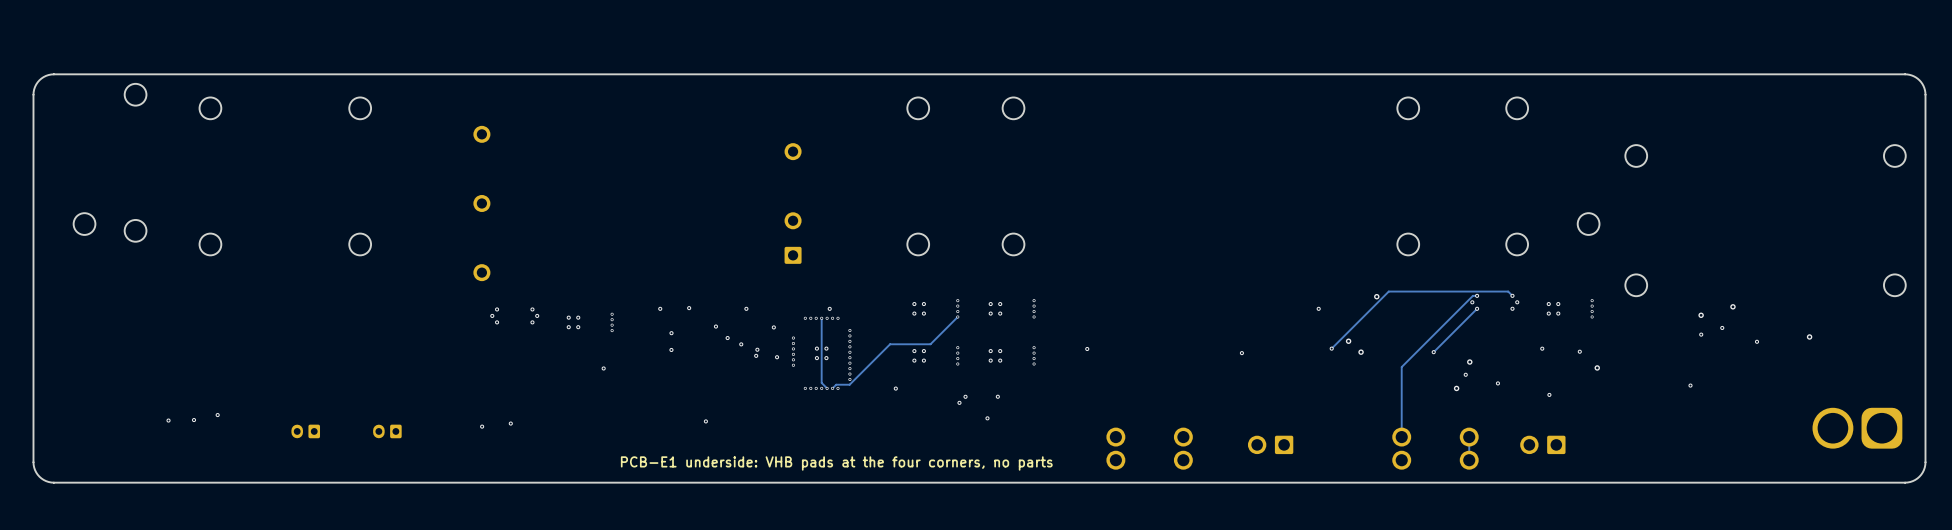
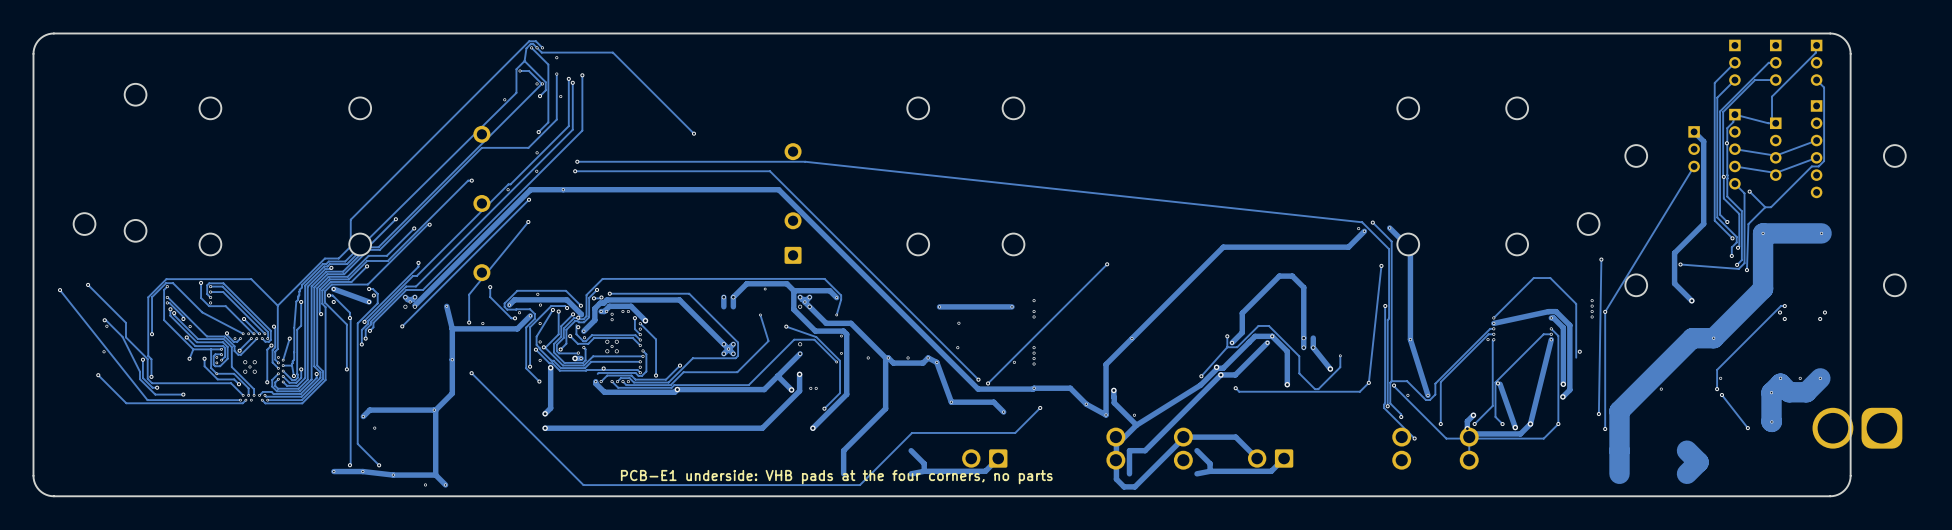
track: none -> (1816, 45) (1815, 52) (1772, 96) (1772, 123)
track: none -> (531, 47) (548, 64) (548, 122) (538, 132)
via: none -> (531, 47)
via: none -> (537, 47)
track: none -> (542, 47) (535, 41) (529, 41) (350, 219) (350, 246) (338, 258) (324, 258) (277, 305)
via: none -> (542, 47)
via: none -> (556, 57)
track: none -> (524, 61) (516, 69) (516, 92) (345, 261) (328, 261) (323, 263) (301, 285) (296, 301) (294, 352)
track: none -> (524, 61) (526, 48) (530, 44) (533, 44) (541, 52) (612, 52) (693, 133)
track: none -> (524, 61) (545, 82) (545, 90) (540, 96)
track: none -> (1734, 62) (1714, 82) (1714, 220) (1732, 238)
part: none -> (1734, 62)
track: none -> (1775, 62) (1768, 62) (1720, 111) (1720, 214) (1727, 222)
part: none -> (1775, 62)
part: none -> (1816, 62)
track: none -> (520, 70) (528, 70) (541, 83)
via: none -> (520, 70)
track: none -> (556, 74) (556, 119) (528, 147) (481, 147) (379, 249) (368, 249) (344, 274) (327, 274) (314, 287) (314, 366) (320, 372) (320, 377) (301, 396) (264, 395)
via: none -> (556, 74)
track: none -> (582, 75) (582, 130) (422, 289) (406, 289) (373, 322) (373, 327) (369, 330)
via: none -> (582, 75)
track: none -> (568, 78) (568, 126) (416, 275) (413, 275) (368, 320) (368, 323) (361, 329) (361, 344)
via: none -> (568, 78)
track: none -> (1734, 80) (1717, 97) (1717, 217) (1736, 236) (1736, 242) (1731, 247) (1731, 255)
track: none -> (1775, 80) (1755, 80) (1723, 112) (1723, 198) (1739, 213) (1738, 247)
track: none -> (1816, 80) (1824, 87) (1824, 161) (1818, 166) (1811, 166) (1771, 207) (1765, 207)
track: none -> (572, 82) (572, 129) (416, 286) (406, 286) (370, 321) (370, 324) (365, 329) (365, 338)
via: none -> (572, 82)
via: none -> (537, 83)
track: none -> (541, 83) (378, 247) (367, 247) (343, 271) (326, 271) (311, 286) (311, 379) (299, 391) (276, 391) (272, 386) (272, 379) (278, 373)
via: none -> (542, 83)
board edge: (33, 94) (35, 86) (39, 80) (46, 75) (53, 74) (1905, 74) (1913, 76) (1919, 80) (1923, 85) (1925, 94) (1925, 462) (1921, 474) (1915, 479) (1907, 482) (53, 482) (46, 481) (39, 476) (35, 470) (33, 462) -> (33, 94) (34, 48) (41, 37) (53, 33) (1830, 33) (1838, 35) (1844, 39) (1849, 46) (1850, 53) (1850, 475) (1846, 488) (1835, 495) (53, 496) (43, 493) (36, 486) (33, 478) (33, 462)
via: none -> (540, 96)
via: none -> (560, 96)
via: none -> (504, 99)
track: none -> (1775, 123) (1768, 123) (1734, 114) (1733, 122) (1727, 128) (1727, 196) (1741, 211) (1741, 260) (1737, 264)
track: none -> (1694, 131) (1703, 141) (1703, 223) (1674, 253) (1674, 283) (1691, 300)
via: none -> (538, 132)
via: none -> (693, 133)
track: none -> (1816, 140) (1775, 155)
via: none -> (1726, 143)
part: none -> (1694, 149)
track: none -> (1734, 149) (1775, 155)
part: none -> (1734, 149)
part: none -> (1775, 149)
part: none -> (1816, 149)
via: none -> (537, 152)
track: none -> (1816, 157) (1775, 172)
track: none -> (577, 161) (805, 161) (1362, 222) (1389, 249) (1387, 406)
via: none -> (577, 161)
track: none -> (1694, 166) (1605, 311) (1605, 429)
track: none -> (1734, 166) (1775, 172)
via: none -> (536, 171)
track: none -> (575, 171) (770, 171) (978, 379)
via: none -> (575, 171)
via: none -> (1723, 176)
track: none -> (471, 180) (468, 180) (387, 261) (367, 261) (348, 279) (329, 279) (319, 289) (321, 314)
via: none -> (471, 180)
track: none -> (1734, 183) (1744, 193) (1744, 263) (1738, 268) (1680, 264)
via: none -> (508, 189)
via: none -> (563, 189)
track: none -> (1749, 191) (1765, 207)
via: none -> (1749, 191)
track: none -> (528, 199) (402, 326)
via: none -> (529, 199)
track: none -> (1765, 207) (1748, 224) (1746, 270)
track: none -> (395, 219) (370, 244) (366, 244) (347, 264) (329, 264) (324, 266) (305, 285) (305, 378) (297, 385) (287, 385) (283, 381)
via: none -> (395, 219)
track: none -> (528, 221) (469, 294) (469, 322)
via: none -> (528, 221)
track: none -> (1372, 222) (1391, 241) (1391, 381)
via: none -> (1372, 222)
via: none -> (1727, 222)
track: none -> (429, 224) (367, 284) (331, 284) (324, 291) (324, 302) (346, 324) (346, 369)
via: none -> (429, 224)
track: none -> (1389, 227) (1410, 248) (1410, 339) (1427, 395)
via: none -> (1389, 227)
track: none -> (414, 228) (386, 255) (368, 255) (347, 276) (328, 276) (317, 288) (317, 365) (323, 371) (323, 378) (301, 400) (267, 400)
via: none -> (414, 228)
via: none -> (1358, 228)
track: none -> (1364, 231) (1348, 247) (1223, 247) (1106, 364) (1106, 414) (1086, 404) (1070, 388) (978, 389) (778, 189) (530, 189) (414, 305)
via: none -> (1364, 231)
via: none -> (1763, 233)
track: none -> (1821, 233) (1763, 233) (1763, 288) (1713, 338) (1692, 338) (1619, 411) (1619, 473)
via: none -> (1821, 233)
via: none -> (1732, 238)
via: none -> (1738, 247)
via: none -> (1731, 255)
track: none -> (1601, 259) (1598, 414)
via: none -> (1601, 259)
track: none -> (418, 262) (418, 266) (364, 321)
via: none -> (418, 262)
track: none -> (1107, 264) (988, 383)
via: none -> (1107, 264)
via: none -> (1680, 264)
via: none -> (1737, 264)
track: none -> (1381, 265) (1368, 382) (1359, 391) (1239, 391) (1235, 388)
via: none -> (1381, 265)
track: none -> (367, 266) (351, 281) (330, 281) (322, 290) (322, 303) (325, 307) (325, 380) (302, 403) (265, 403) (262, 400)
via: none -> (367, 266)
track: none -> (331, 267) (325, 269) (307, 286) (307, 379) (298, 388) (277, 388) (275, 382) (278, 379)
via: none -> (331, 267)
via: none -> (1746, 270)
track: none -> (201, 282) (201, 298) (209, 306) (225, 306) (254, 333)
via: none -> (201, 282)
track: none -> (88, 284) (125, 322) (125, 337) (147, 359) (147, 378) (152, 383) (231, 383) (243, 395)
via: none -> (88, 284)
track: none -> (167, 286) (164, 289) (164, 320) (193, 349)
via: none -> (167, 286)
track: none -> (210, 286) (222, 286) (268, 332) (267, 338)
via: none -> (210, 286)
track: none -> (490, 287) (490, 297) (511, 318) (515, 318)
via: none -> (490, 287)
track: none -> (333, 289) (369, 301)
via: none -> (333, 289)
track: none -> (369, 289) (372, 289) (377, 293) (377, 303) (357, 323) (357, 443) (379, 465)
via: none -> (369, 289)
track: none -> (597, 289) (589, 297) (589, 317) (584, 322) (575, 321) (566, 329) (566, 343) (560, 349)
via: none -> (597, 289)
via: none -> (765, 289)
track: none -> (60, 290) (147, 400) (240, 400)
via: none -> (60, 290)
track: none -> (793, 290) (786, 283) (746, 283) (733, 297) (733, 306)
track: none -> (793, 290) (829, 290) (836, 297)
track: none -> (793, 290) (793, 309) (815, 331) (843, 331) (846, 334) (846, 394) (812, 428)
track: none -> (210, 292) (223, 292) (264, 333)
via: none -> (210, 292)
track: none -> (609, 293) (689, 293) (738, 342) (738, 355) (735, 358) (692, 358) (668, 382) (633, 382) (629, 378) (620, 378) (617, 381)
via: none -> (609, 293)
via: none -> (537, 294)
track: none -> (328, 295) (332, 295) (349, 312) (349, 465)
via: none -> (328, 295)
via: none -> (373, 295)
track: (1477, 295) (1472, 295) (1401, 367) (1401, 437) -> none
via: (1477, 295) -> none
track: (1512, 295) (1508, 291) (1388, 291) (1331, 348) -> none
via: (1512, 295) -> none
via: (1376, 296) -> none
track: none -> (167, 297) (206, 336) (224, 336) (234, 346) (234, 351) (238, 354) (240, 354) (256, 338)
via: none -> (167, 297)
track: none -> (210, 297) (207, 294) (207, 285) (209, 283) (223, 283) (270, 330) (270, 339) (268, 341) (265, 341) (262, 338)
via: none -> (210, 297)
via: none -> (405, 297)
track: none -> (414, 297) (412, 299) (407, 299) (405, 297)
via: none -> (414, 297)
track: none -> (601, 297) (593, 298)
via: none -> (601, 297)
track: none -> (723, 297) (723, 306)
via: none -> (723, 297)
via: none -> (733, 297)
via: none -> (800, 297)
track: none -> (809, 297) (807, 299) (802, 299) (800, 297)
via: none -> (809, 297)
via: none -> (836, 297)
via: none -> (593, 298)
track: none -> (804, 299) (804, 302) (826, 323) (851, 323) (885, 357)
via: (957, 300) -> none
track: none -> (301, 301) (301, 325) (297, 329) (297, 377) (292, 380) (283, 371)
via: none -> (301, 301)
via: none -> (333, 301)
via: none -> (369, 301)
track: none -> (167, 302) (183, 316) (183, 319)
via: none -> (167, 302)
via: none -> (210, 302)
via: none -> (410, 302)
via: none -> (804, 302)
via: (1472, 302) -> none
via: (1517, 302) -> none
via: (914, 304) -> none
via: (923, 304) -> none
via: (990, 304) -> none
via: (1000, 304) -> none
via: (1548, 304) -> none
via: (1558, 304) -> none
track: none -> (277, 305) (251, 279) (166, 279) (148, 297) (148, 356) (151, 359) (151, 376)
track: none -> (277, 305) (277, 349) (275, 351) (275, 359) (278, 362)
track: none -> (509, 305) (514, 299) (566, 299) (581, 314)
via: none -> (509, 305)
via: none -> (540, 305)
track: none -> (580, 305) (565, 290) (517, 290) (504, 303) (507, 309) (530, 309) (534, 314) (534, 318) (526, 327) (526, 368) (539, 381)
via: none -> (580, 305)
via: none -> (405, 306)
via: none -> (414, 306)
track: none -> (446, 306) (452, 328)
via: none -> (446, 306)
via: none -> (800, 306)
via: none -> (809, 306)
via: none -> (939, 306)
via: (957, 306) -> none
track: none -> (1011, 306) (939, 306)
via position: (1034, 306) -> (1011, 306)
track: none -> (1385, 306) (1383, 407) (1414, 438)
via: none -> (1385, 306)
via: (1732, 306) -> none
track: none -> (1784, 306) (1780, 306) (1717, 369) (1717, 389)
via: none -> (1784, 306)
track: none -> (567, 308) (565, 306) (551, 306) (530, 327) (530, 366)
via: none -> (567, 308)
via: (660, 308) -> none
via: (689, 308) -> none
via: (746, 308) -> none
via: (829, 308) -> none
via: (1318, 308) -> none
track: (1477, 308) (1433, 352) -> none
via: (1477, 308) -> none
via: (1512, 308) -> none
track: none -> (170, 309) (170, 315) (196, 342) (223, 342) (227, 346) (227, 358) (220, 366) (215, 366) (213, 356) (221, 354)
via: none -> (170, 309)
via: (497, 309) -> none
via: (532, 309) -> none
track: none -> (552, 309) (536, 336) (536, 345) (560, 368) (585, 368) (591, 361) (640, 361)
via: none -> (552, 309)
track: none -> (558, 311) (558, 334) (545, 347)
via: none -> (558, 311)
track: none -> (601, 311) (604, 311) (609, 306) (631, 306) (645, 320)
via: none -> (601, 311)
via: none -> (606, 311)
via: none -> (622, 311)
via: none -> (628, 311)
via: (957, 311) -> none
via: none -> (1605, 311)
via: none -> (519, 312)
via: none -> (1780, 312)
via: none -> (1824, 312)
track: none -> (174, 313) (198, 339) (223, 339) (231, 347) (231, 367) (254, 389) (254, 395)
via: none -> (174, 313)
via: (914, 313) -> none
via: (923, 313) -> none
via: (990, 313) -> none
via: (1000, 313) -> none
via: (1548, 313) -> none
via: (1558, 313) -> none
via: none -> (321, 314)
track: none -> (573, 314) (561, 326) (561, 336) (553, 344) (553, 352) (564, 362) (582, 362) (585, 360) (583, 347)
via: none -> (573, 314)
track: none -> (760, 314) (768, 341) (737, 372) (683, 372) (670, 385) (626, 385) (622, 381)
via: none -> (760, 314)
track: none -> (836, 314) (841, 295) (824, 278) (602, 278) (586, 295) (586, 316) (583, 319) (574, 318) (563, 328) (563, 337) (556, 344) (556, 351) (559, 353) (578, 353)
via: none -> (836, 314)
via: (492, 315) -> none
track: none -> (530, 315) (517, 328) (452, 328)
via: none -> (530, 315)
via: (537, 315) -> none
via position: (1701, 315) -> (1691, 300)
track: (957, 316) (930, 344) (890, 344) (849, 384) (836, 384) (832, 388) -> none
via: (957, 316) -> none
via: (568, 317) -> none
track: none -> (1493, 317) (1533, 278) (1550, 278) (1576, 303) (1576, 357)
via: none -> (1493, 317)
track: none -> (1551, 317) (1563, 327) (1563, 384)
via: none -> (1551, 317)
via: none -> (349, 318)
via: none -> (515, 318)
track: none -> (634, 318) (634, 329) (640, 334)
via: none -> (634, 318)
via: (805, 318) -> none
via: (810, 318) -> none
via: (816, 318) -> none
track: (821, 318) (821, 382) (827, 388) -> none
via: (821, 318) -> none
via: (827, 318) -> none
via: (832, 318) -> none
via: (838, 318) -> none
via: none -> (1784, 318)
via: none -> (1820, 318)
via: none -> (183, 319)
track: none -> (244, 319) (259, 333)
via: none -> (244, 319)
track: none -> (104, 320) (122, 336) (139, 371) (139, 379) (155, 394) (183, 394)
via: none -> (104, 320)
via: none -> (645, 320)
via: none -> (364, 321)
via: none -> (469, 322)
via: (497, 322) -> none
via: (532, 322) -> none
via: none -> (482, 323)
via: none -> (540, 323)
track: none -> (640, 323) (656, 339) (656, 375)
via: none -> (640, 323)
via: none -> (958, 323)
track: none -> (1493, 323) (1556, 311) (1569, 325) (1569, 389) (1562, 396)
via: none -> (1493, 323)
track: none -> (576, 325) (576, 334) (583, 341) (591, 335) (635, 335) (640, 340)
via: (612, 325) -> none
via: none -> (106, 326)
via: none -> (190, 326)
track: none -> (273, 326) (275, 347) (272, 349) (272, 362) (278, 368)
via: none -> (273, 326)
via: none -> (402, 326)
via: (715, 326) -> none
track: none -> (786, 326) (816, 337) (840, 360) (840, 393) (824, 408)
via: (568, 327) -> none
via position: (773, 327) -> (786, 326)
via: (1722, 327) -> none
track: none -> (452, 328) (452, 393) (435, 410)
track: none -> (1493, 328) (1490, 328) (1435, 383) (1435, 394) (1429, 400) (1425, 400) (1407, 381) (1391, 381)
via: none -> (1493, 328)
track: none -> (1551, 328) (1558, 335) (1558, 424) (1543, 438) (1446, 438) (1394, 385)
via: none -> (1551, 328)
via: none -> (640, 329)
via: none -> (369, 330)
via: (612, 330) -> none
via: (849, 330) -> none
track: none -> (583, 331) (594, 320) (594, 308) (606, 299) (679, 299) (733, 353)
via: none -> (583, 331)
track: none -> (226, 333) (233, 341) (237, 341) (240, 338)
via: none -> (226, 333)
track: none -> (243, 333) (202, 312) (173, 283) (166, 283) (152, 297) (152, 334)
via: none -> (243, 333)
via: none -> (248, 333)
via: none -> (254, 333)
via: none -> (259, 333)
via: none -> (264, 333)
via: (671, 333) -> none
via: none -> (152, 334)
via: none -> (640, 334)
track: none -> (1493, 334) (1488, 334) (1440, 382) (1440, 424)
via: none -> (1493, 334)
track: none -> (1551, 334) (1543, 334) (1495, 382) (1495, 416) (1502, 424)
via: none -> (1551, 334)
via: (1701, 334) -> none
via: (849, 335) -> none
track: none -> (570, 336) (577, 343) (588, 343) (594, 338) (632, 338) (640, 345)
via: none -> (570, 336)
via: none -> (841, 336)
track: none -> (1227, 336) (1227, 347)
via: none -> (1227, 336)
via: none -> (1272, 336)
via: (1809, 336) -> none
track: none -> (186, 337) (195, 346) (223, 346) (225, 348) (225, 356) (221, 360)
via: none -> (186, 337)
via: none -> (584, 337)
via: none -> (235, 338)
via: none -> (240, 338)
track: none -> (251, 338) (239, 350)
via: none -> (251, 338)
via: none -> (256, 338)
via: none -> (262, 338)
via: none -> (267, 338)
track: none -> (289, 338) (283, 360)
via: none -> (289, 338)
via: none -> (365, 338)
via: (727, 338) -> none
via: (793, 338) -> none
via: none -> (1131, 338)
via: none -> (1303, 338)
track: none -> (1313, 338) (1313, 347) (1330, 368)
via: none -> (1713, 338)
via: none -> (1410, 339)
via: none -> (1488, 339)
track: none -> (1493, 339) (1492, 405) (1474, 424)
via: none -> (1493, 339)
track: none -> (1551, 339) (1530, 424) (1520, 433) (1472, 433) (1467, 428) (1467, 421) (1473, 415)
via: none -> (1551, 339)
via: none -> (640, 340)
via: none -> (540, 341)
via: none -> (607, 341)
via: none -> (616, 341)
via: (849, 341) -> none
via: (1348, 341) -> none
via: (1757, 341) -> none
track: none -> (1232, 342) (1242, 332) (1242, 313) (1279, 276) (1292, 276) (1303, 287) (1303, 347)
via: none -> (1232, 342)
track: none -> (1267, 342) (1235, 374) (1220, 374) (1145, 450) (1129, 450) (1129, 473)
via: none -> (1267, 342)
via: (793, 343) -> none
via: none -> (361, 344)
via: none -> (723, 344)
track: none -> (733, 344) (723, 353)
via: none -> (733, 344)
via: (741, 344) -> none
via: none -> (800, 344)
track: none -> (271, 345) (267, 349) (267, 382)
via: none -> (271, 345)
via: none -> (640, 345)
via: none -> (612, 346)
via: (849, 346) -> none
via: none -> (543, 347)
track: none -> (545, 347) (562, 365) (584, 365) (593, 356) (643, 356)
via: none -> (583, 347)
track: none -> (1227, 347) (1201, 376)
track: none -> (1227, 347) (1237, 347) (1258, 325) (1268, 325) (1299, 356) (1299, 373) (1315, 389) (1318, 389) (1340, 367) (1340, 355)
via: none -> (1303, 347)
via: none -> (1313, 347)
via: (793, 348) -> none
via: (816, 348) -> none
via: (826, 348) -> none
via: (1087, 348) -> none
via: (1331, 348) -> none
via: (1542, 348) -> none
track: none -> (193, 349) (189, 358)
track: none -> (211, 349) (211, 368) (216, 373) (234, 373) (248, 388) (248, 395)
track: none -> (221, 349) (193, 349)
via: none -> (221, 349)
track: none -> (535, 349) (559, 370) (637, 370) (640, 372)
via: none -> (535, 349)
via: none -> (560, 349)
via: (671, 349) -> none
via: none -> (728, 349)
via: (757, 349) -> none
via: none -> (239, 350)
track: none -> (643, 350) (646, 354) (646, 371) (641, 375) (635, 372) (597, 373)
via: none -> (643, 350)
via: none -> (104, 351)
via: none -> (607, 351)
via: none -> (616, 351)
via: (914, 351) -> none
via: (923, 351) -> none
via: (990, 351) -> none
via: (1000, 351) -> none
track: none -> (294, 352) (292, 365)
via: (849, 352) -> none
via: (1361, 352) -> none
via: (1433, 352) -> none
via: none -> (578, 353)
via: none -> (723, 353)
via: none -> (733, 353)
track: none -> (800, 353) (777, 376)
via: none -> (800, 353)
via: none -> (841, 353)
via: (957, 353) -> none
via: (1241, 353) -> none
via: none -> (221, 354)
via: (793, 354) -> none
via: (756, 355) -> none
via: none -> (1340, 355)
via: none -> (643, 356)
via: none -> (216, 357)
via: none -> (278, 357)
via: (777, 357) -> none
via: (849, 357) -> none
via: none -> (868, 357)
track: none -> (885, 357) (885, 408) (843, 450) (843, 473)
track: none -> (885, 357) (893, 363) (923, 363) (928, 357) (936, 362) (951, 402) (993, 402) (1003, 412)
via: none -> (888, 357)
via: none -> (908, 357)
via: none -> (928, 357)
via: none -> (189, 358)
track: none -> (204, 358) (204, 366) (217, 379) (234, 379) (238, 384)
via: none -> (204, 358)
via: none -> (575, 358)
track: none -> (581, 358) (575, 358)
via: none -> (581, 358)
via: (816, 358) -> none
via: (826, 358) -> none
via: (957, 358) -> none
track: none -> (142, 359) (142, 378) (152, 387) (157, 387)
via: none -> (142, 359)
via: none -> (452, 359)
via: (793, 359) -> none
via: none -> (221, 360)
via: none -> (283, 360)
via: none -> (540, 360)
via: (914, 360) -> none
via: (923, 360) -> none
via: (990, 360) -> none
via: (1000, 360) -> none
via: none -> (640, 361)
via: none -> (216, 362)
via: none -> (245, 362)
via: none -> (254, 362)
via: none -> (278, 362)
track: none -> (836, 362) (814, 339) (794, 339) (748, 385) (674, 385) (671, 387) (618, 387) (612, 381)
via: none -> (836, 362)
via: none -> (936, 362)
via: none -> (1014, 362)
via: (1469, 362) -> none
via: (849, 363) -> none
via: (957, 364) -> none
via: none -> (283, 365)
track: none -> (292, 365) (293, 376)
track: none -> (292, 365) (283, 365)
track: none -> (680, 365) (665, 379) (635, 379) (631, 375) (607, 375) (601, 381)
via: none -> (680, 365)
via: (793, 365) -> none
via: none -> (249, 366)
via: none -> (530, 366)
track: none -> (550, 367) (550, 408) (545, 413)
via: none -> (550, 367)
via: none -> (640, 367)
via: none -> (1216, 367)
via: (1597, 367) -> none
via: none -> (278, 368)
via: (849, 368) -> none
track: none -> (1217, 368) (1223, 368) (1255, 336) (1272, 336) (1287, 351) (1287, 384)
track: none -> (1217, 368) (1200, 385) (1136, 425)
via: none -> (1330, 368)
track: none -> (301, 369) (301, 377) (296, 382) (289, 382) (283, 376)
via: none -> (301, 369)
via: none -> (346, 369)
via: none -> (245, 371)
via: none -> (254, 371)
via: none -> (283, 371)
via: none -> (640, 372)
via: none -> (216, 373)
via: none -> (278, 373)
track: none -> (471, 373) (583, 485) (859, 485) (912, 432) (1015, 432) (1040, 407)
via: none -> (471, 373)
track: none -> (316, 374) (316, 378) (300, 393) (262, 391) (259, 395)
via: none -> (316, 374)
track: none -> (799, 374) (799, 391) (762, 428) (545, 428)
via: none -> (799, 374)
via: (849, 374) -> none
via: none -> (1220, 374)
via: (1465, 374) -> none
track: none -> (98, 375) (126, 403) (242, 403) (245, 400)
via: none -> (98, 375)
via: none -> (656, 375)
via: none -> (151, 376)
via: none -> (283, 376)
via: none -> (293, 376)
track: none -> (777, 376) (764, 389) (604, 392) (595, 381)
track: none -> (777, 376) (791, 389)
via: none -> (1201, 376)
via: none -> (1720, 378)
via: none -> (1780, 378)
via: none -> (1800, 378)
track: none -> (1820, 378) (1806, 392) (1789, 392) (1780, 383) (1771, 392) (1771, 421)
via: none -> (1820, 378)
via: none -> (278, 379)
via: (849, 379) -> none
via: none -> (978, 379)
via: none -> (283, 381)
via: none -> (539, 381)
via: none -> (595, 381)
via: none -> (601, 381)
via: none -> (612, 381)
via: none -> (617, 381)
via: none -> (622, 381)
via: none -> (628, 381)
track: none -> (1391, 381) (1390, 403) (1401, 414) (1401, 417)
via: none -> (267, 382)
via: none -> (1368, 382)
via: none -> (988, 383)
via: none -> (238, 384)
via: none -> (1287, 384)
track: none -> (1500, 384) (1515, 427)
via: none -> (1563, 384)
via: none -> (1394, 385)
via: (1690, 385) -> none
via: none -> (157, 387)
via: (805, 388) -> none
via: (821, 388) -> none
via: (827, 388) -> none
via: (832, 388) -> none
via: (838, 388) -> none
via: (895, 388) -> none
via: none -> (1034, 388)
via: none -> (1235, 388)
via: (1456, 388) -> none
via: none -> (677, 389)
via: none -> (791, 389)
via: none -> (1661, 389)
via: none -> (1717, 389)
track: none -> (1113, 390) (1114, 402) (1136, 425)
via: none -> (1113, 390)
via: none -> (1771, 392)
via: none -> (183, 394)
via: (1549, 394) -> none
track: none -> (1721, 394) (1747, 428)
via: none -> (1721, 394)
via: none -> (243, 395)
via: none -> (248, 395)
via: none -> (254, 395)
via: none -> (259, 395)
via: none -> (264, 395)
via: none -> (1407, 395)
via: none -> (1427, 395)
via: (965, 396) -> none
via: (997, 396) -> none
via: none -> (1562, 396)
via: none -> (240, 400)
via: none -> (245, 400)
via: none -> (251, 400)
via: none -> (262, 400)
via: none -> (267, 400)
via: none -> (951, 402)
via: (959, 402) -> none
via: none -> (1086, 404)
via: none -> (1387, 406)
via: none -> (1040, 407)
via: none -> (824, 408)
via: none -> (434, 410)
track: none -> (435, 410) (435, 475)
track: none -> (435, 410) (369, 410) (363, 416)
via: none -> (1003, 412)
via: none -> (545, 413)
via: none -> (1106, 414)
via: none -> (1598, 414)
via: (217, 415) -> none
via: none -> (1134, 415)
via: none -> (1473, 415)
via: none -> (363, 416)
via: none -> (1401, 417)
via: (987, 418) -> none
via: (168, 420) -> none
via: (194, 420) -> none
via: (705, 421) -> none
via: none -> (1771, 421)
via: (510, 423) -> none
via: none -> (1440, 424)
via: none -> (1474, 424)
via: none -> (1502, 424)
via: none -> (1530, 424)
via: none -> (1558, 424)
track: none -> (1136, 425) (1116, 445) (1116, 479) (1124, 486) (1134, 486) (1184, 437) (1235, 437) (1257, 458)
via: (482, 426) -> none
via: none -> (1515, 427)
via: none -> (374, 428)
via: none -> (545, 428)
via: none -> (812, 428)
via: none -> (1467, 428)
via: none -> (1747, 428)
via: none -> (1605, 429)
part: (305, 431) -> none
part: (387, 431) -> none
via: none -> (1414, 438)
part position: (1270, 444) -> (1270, 458)
part: (1542, 444) -> none
track: none -> (911, 450) (924, 463) (924, 471)
track: none -> (1197, 450) (1210, 463) (1210, 471)
track: none -> (1687, 450) (1698, 462) (1687, 473)
part: none -> (984, 458)
track: none -> (998, 458) (985, 471) (924, 471)
track: none -> (1284, 458) (1271, 471) (1210, 471)
text position: PCB-E1 underside: VHB pads at the four corners, no parts (836, 463) -> PCB-E1 underside: VHB pads at the four corners, no parts (836, 477)
via: none -> (349, 465)
via: none -> (379, 465)
track: none -> (333, 471) (435, 475)
via: none -> (333, 471)
via: none -> (362, 471)
track: none -> (924, 471) (911, 473)
track: none -> (1210, 471) (1197, 473)
via: none -> (393, 475)
track: none -> (435, 475) (445, 484)
via: none -> (425, 484)
via: none -> (445, 484)

